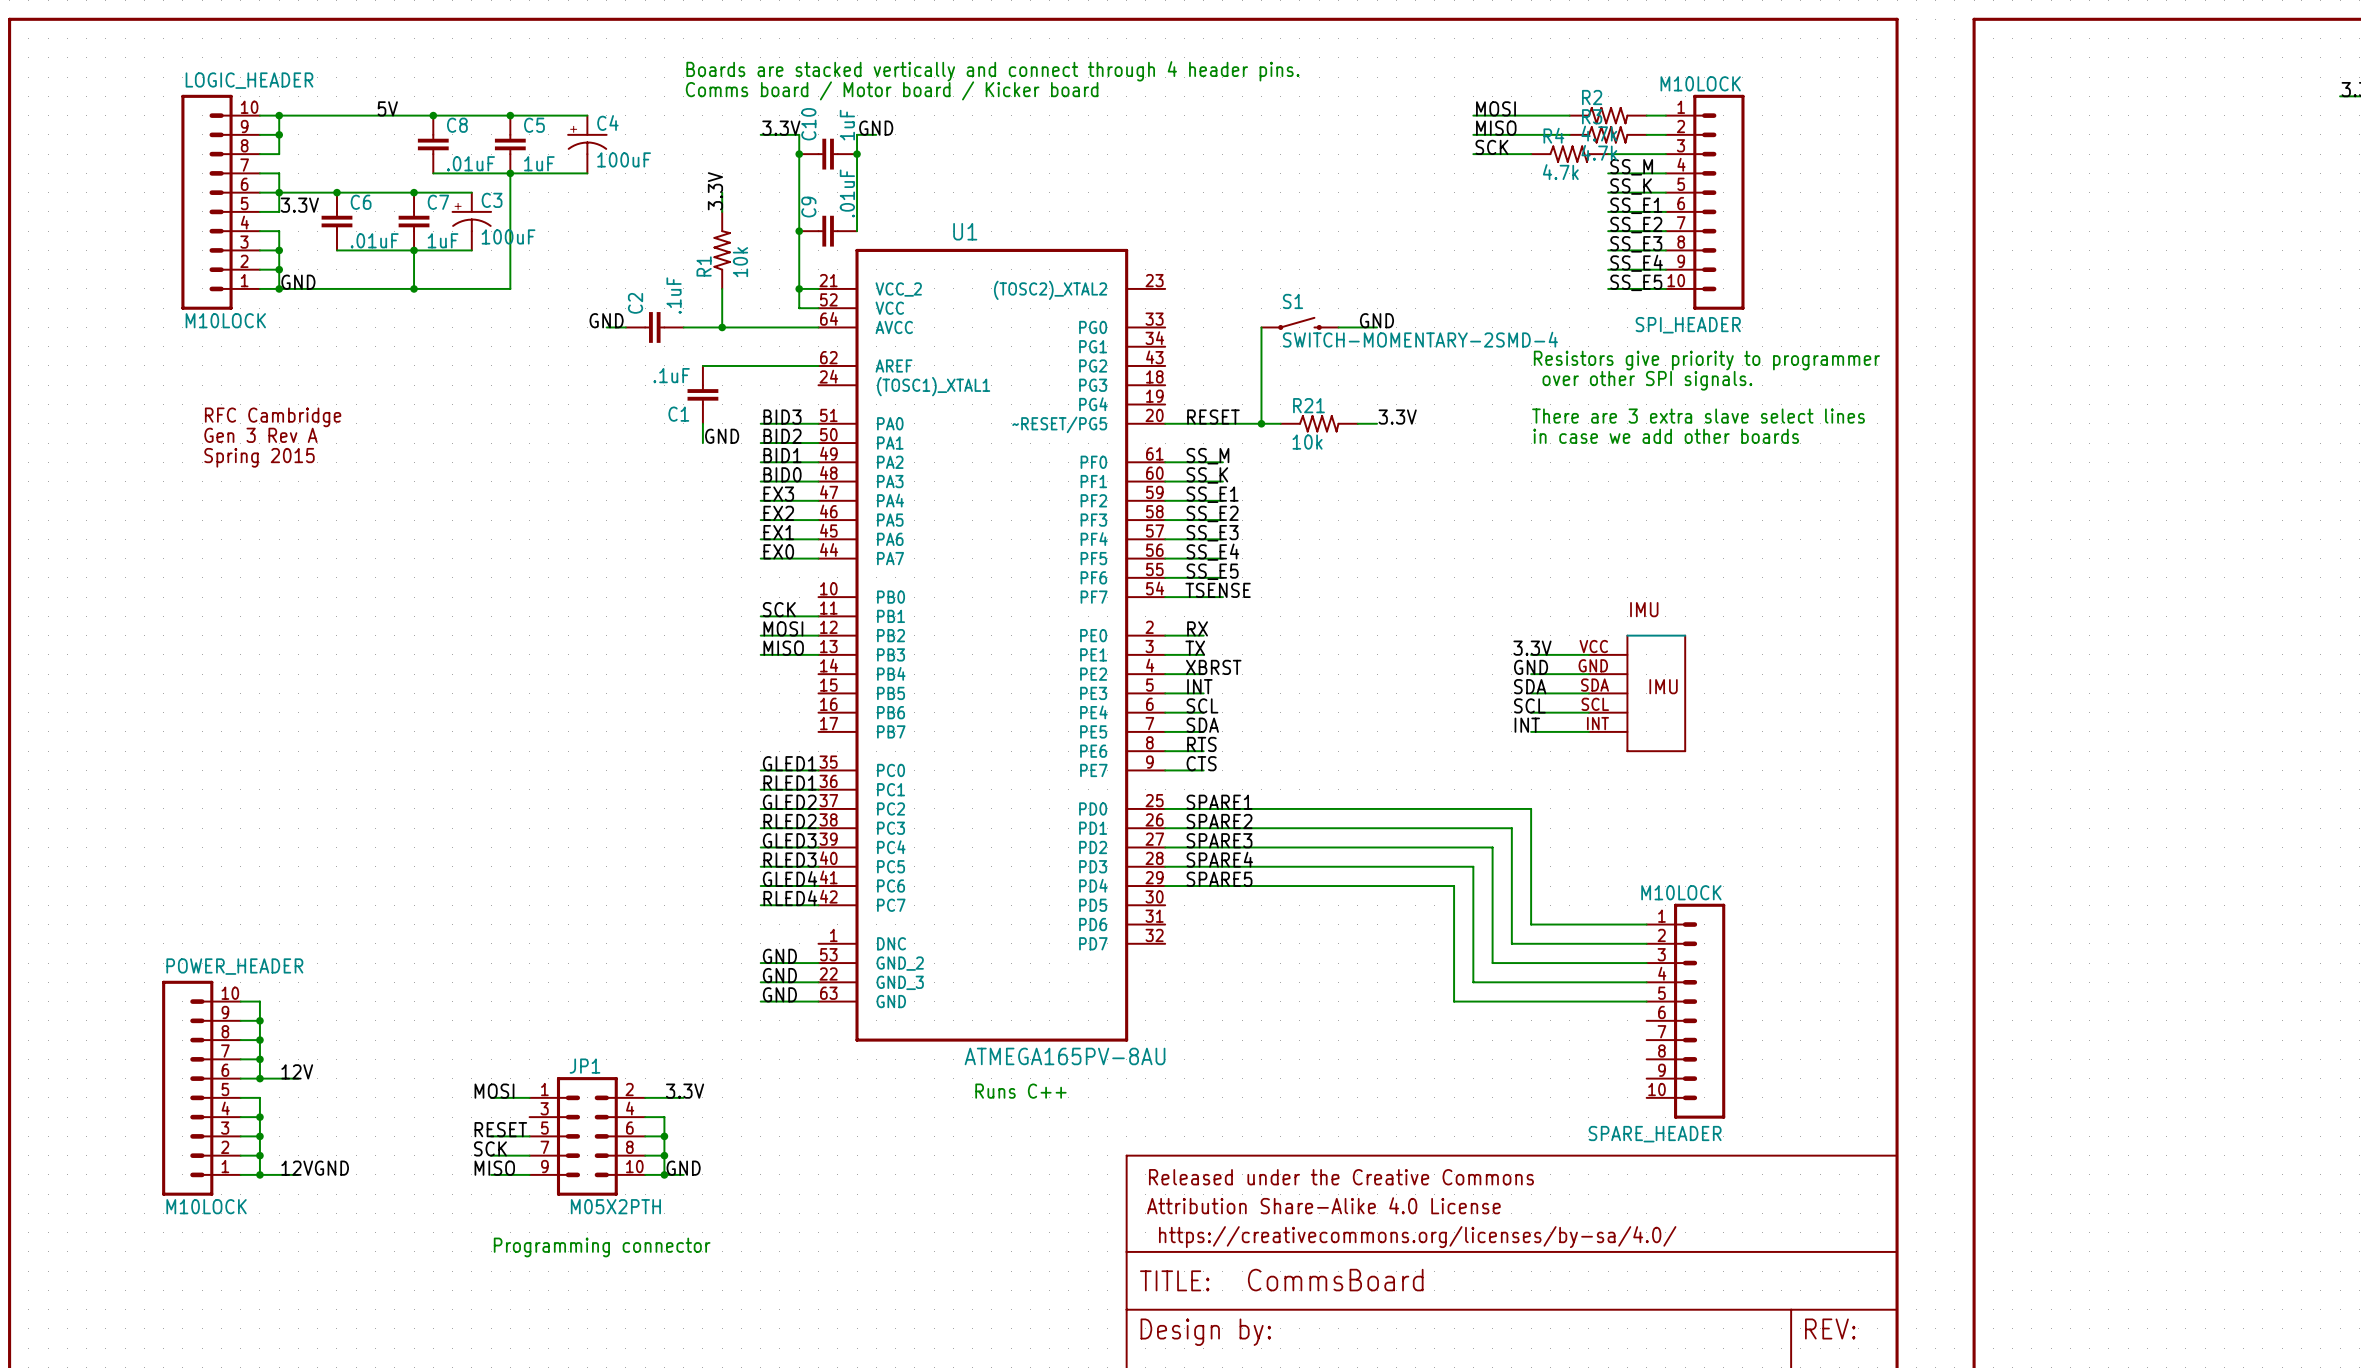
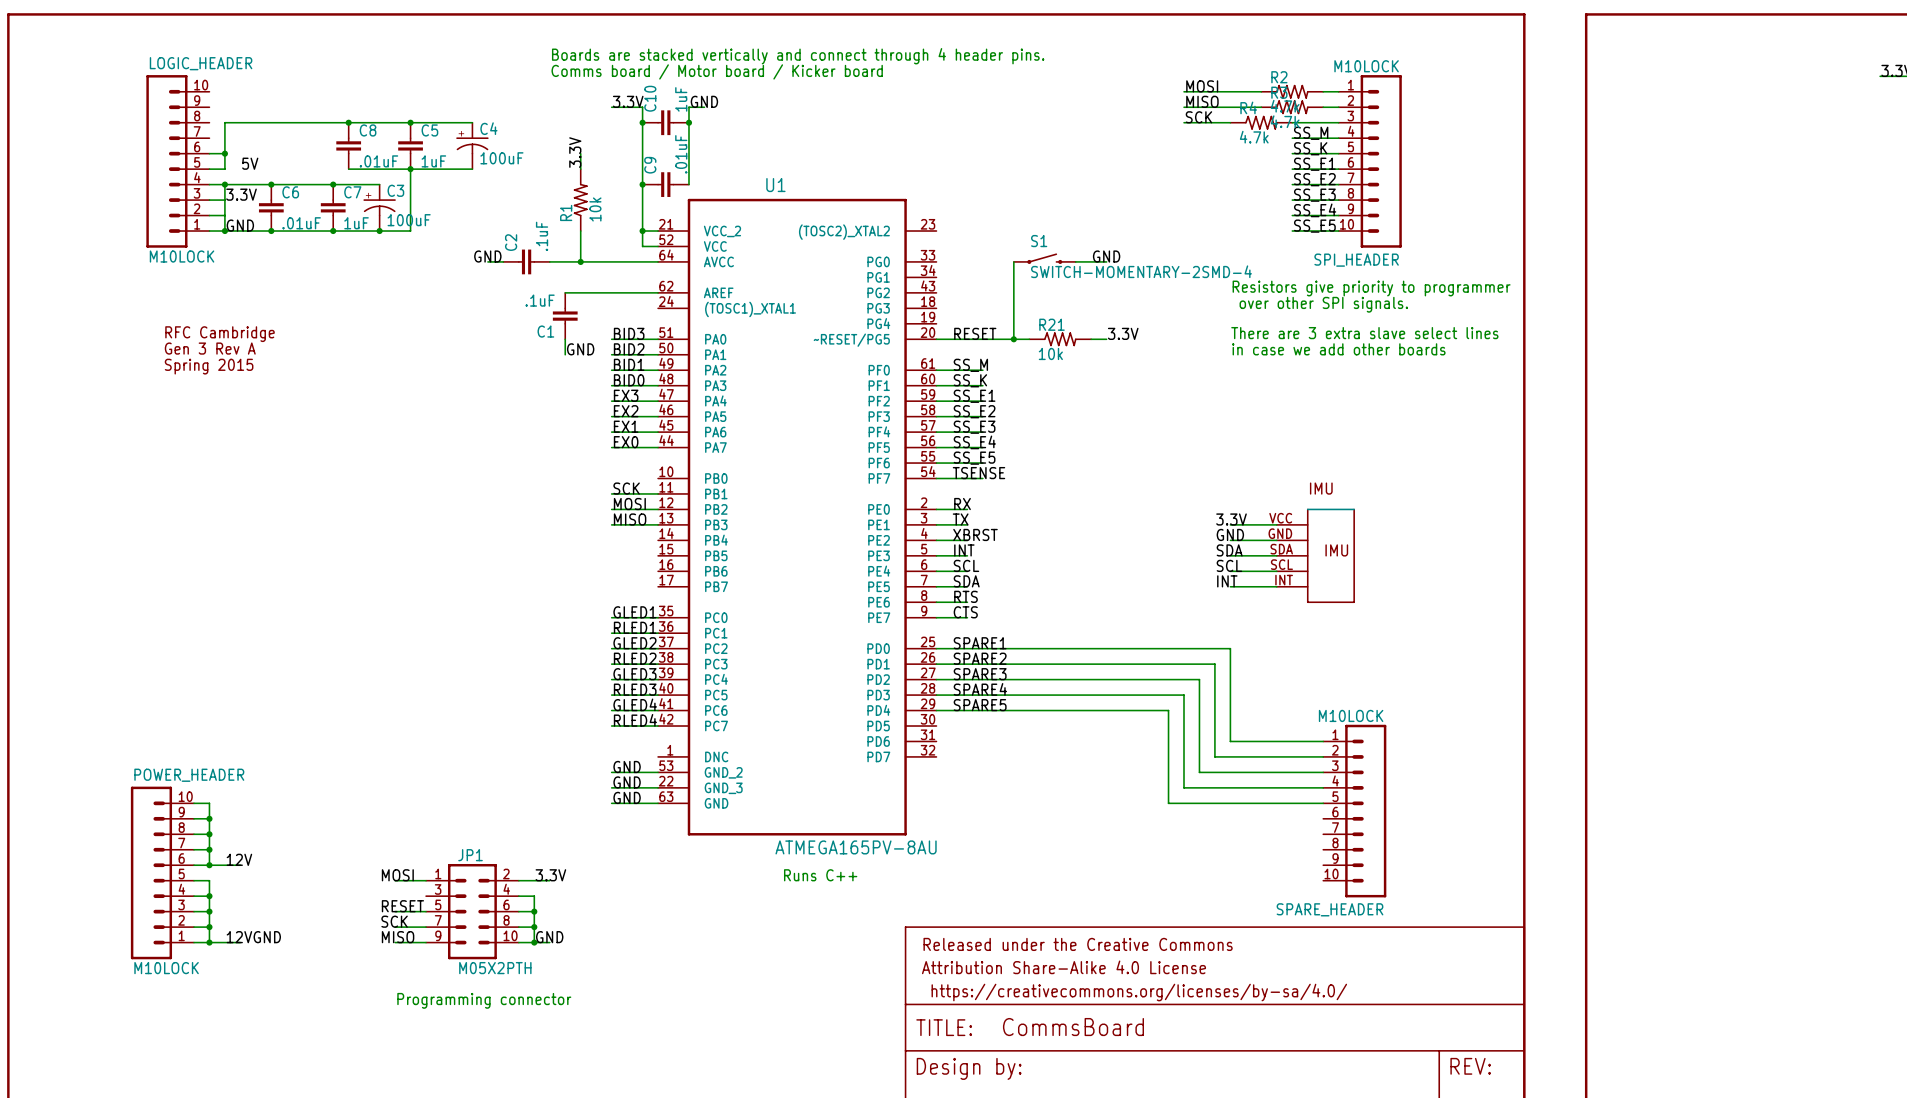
label position: 5V (387, 108) -> 5V (250, 163)
wire: (259, 115) (587, 115) -> none
wire: (279, 115) (279, 154) (259, 154) -> none
junction: (279, 115) -> none
junction: (433, 115) -> none
junction: (510, 115) -> none
wire: (259, 134) (279, 134) -> none
junction: (279, 134) -> none
C8 position: (433, 144) -> (348, 145)
C5 position: (510, 144) -> (410, 145)
C4 position: (587, 144) -> (472, 145)
junction: none -> (348, 122)
junction: none -> (410, 122)
wire: (259, 173) (279, 173) -> (472, 122) (224, 122) (224, 138)
wire: (433, 173) (587, 173) -> (348, 169) (472, 169)
junction: (510, 173) -> none
wire: (279, 192) (471, 192) -> (224, 184) (379, 184)
junction: (336, 192) -> none
junction: (414, 192) -> none
label position: 3.3V (299, 205) -> 3.3V (241, 194)
junction: none -> (410, 169)
C6 position: (336, 221) -> (271, 207)
C7 position: (414, 221) -> (333, 207)
C3 position: (471, 221) -> (379, 207)
junction: none -> (224, 184)
junction: none -> (271, 184)
junction: none -> (333, 184)
junction: (279, 250) -> none
wire: (336, 250) (471, 250) -> none
junction: (414, 250) -> none
junction: (279, 269) -> none
junction: none -> (271, 231)
junction: none -> (379, 231)

